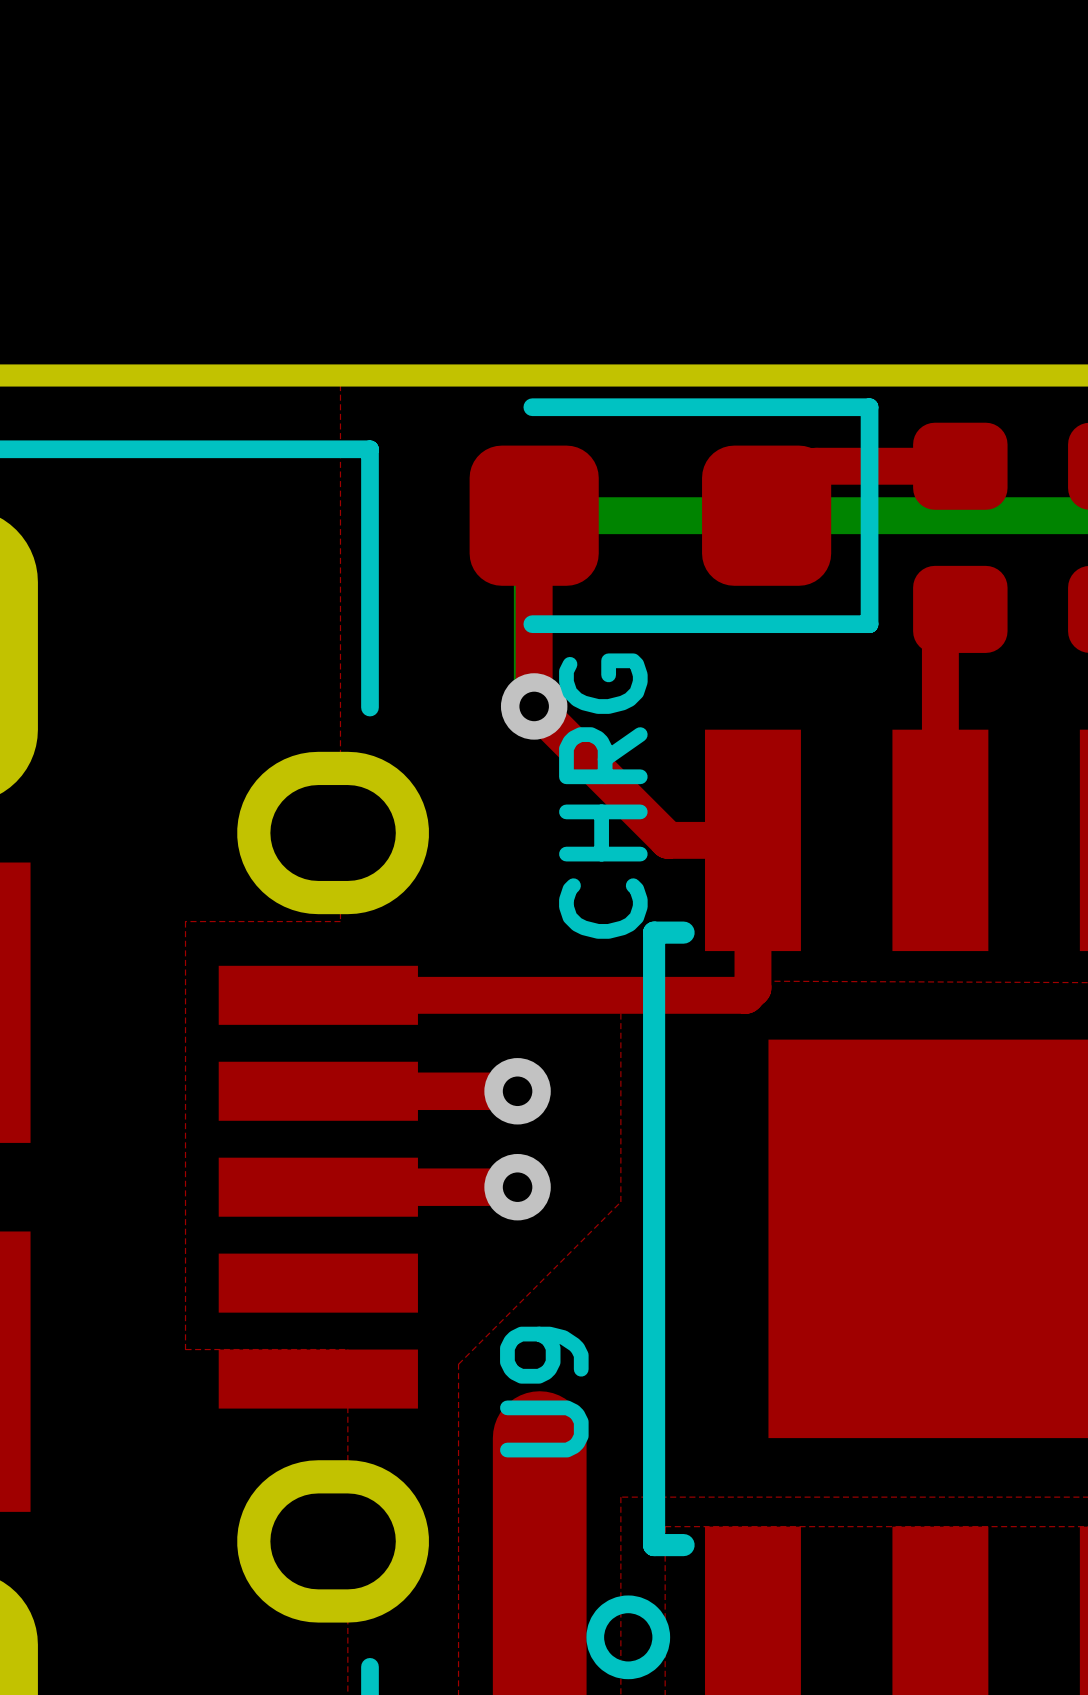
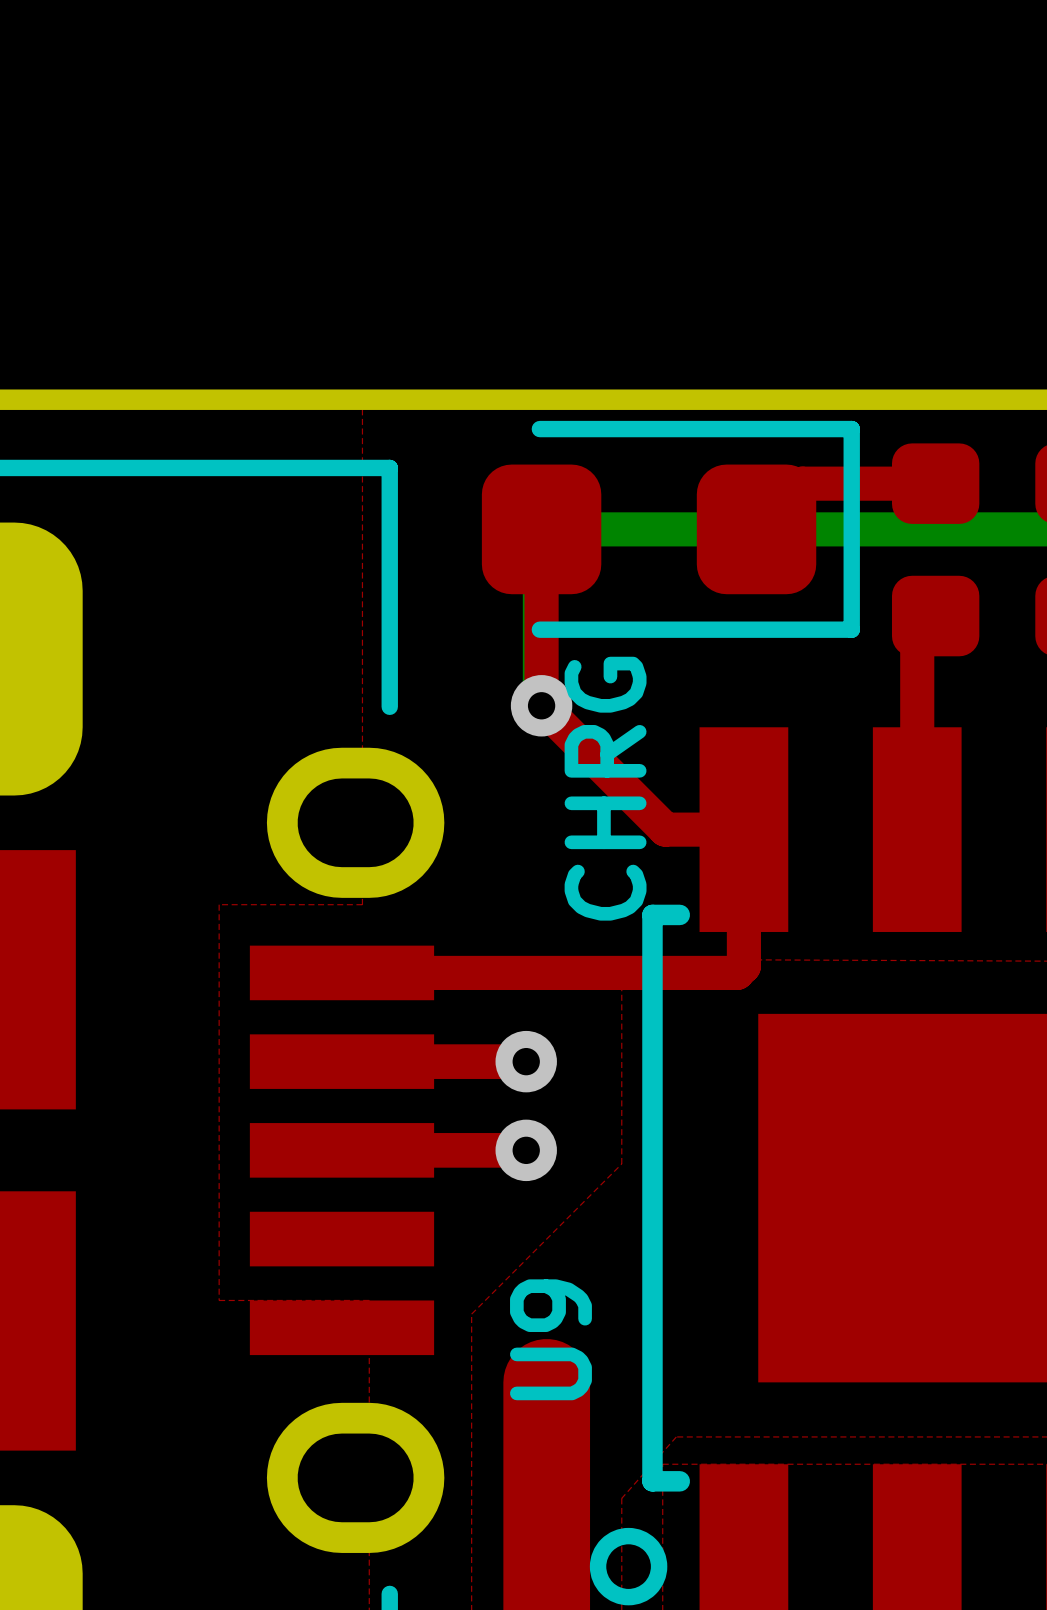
top zone outline: (679, 1497) (620, 1497) (620, 1563) -> (676, 1436) (621, 1498)

